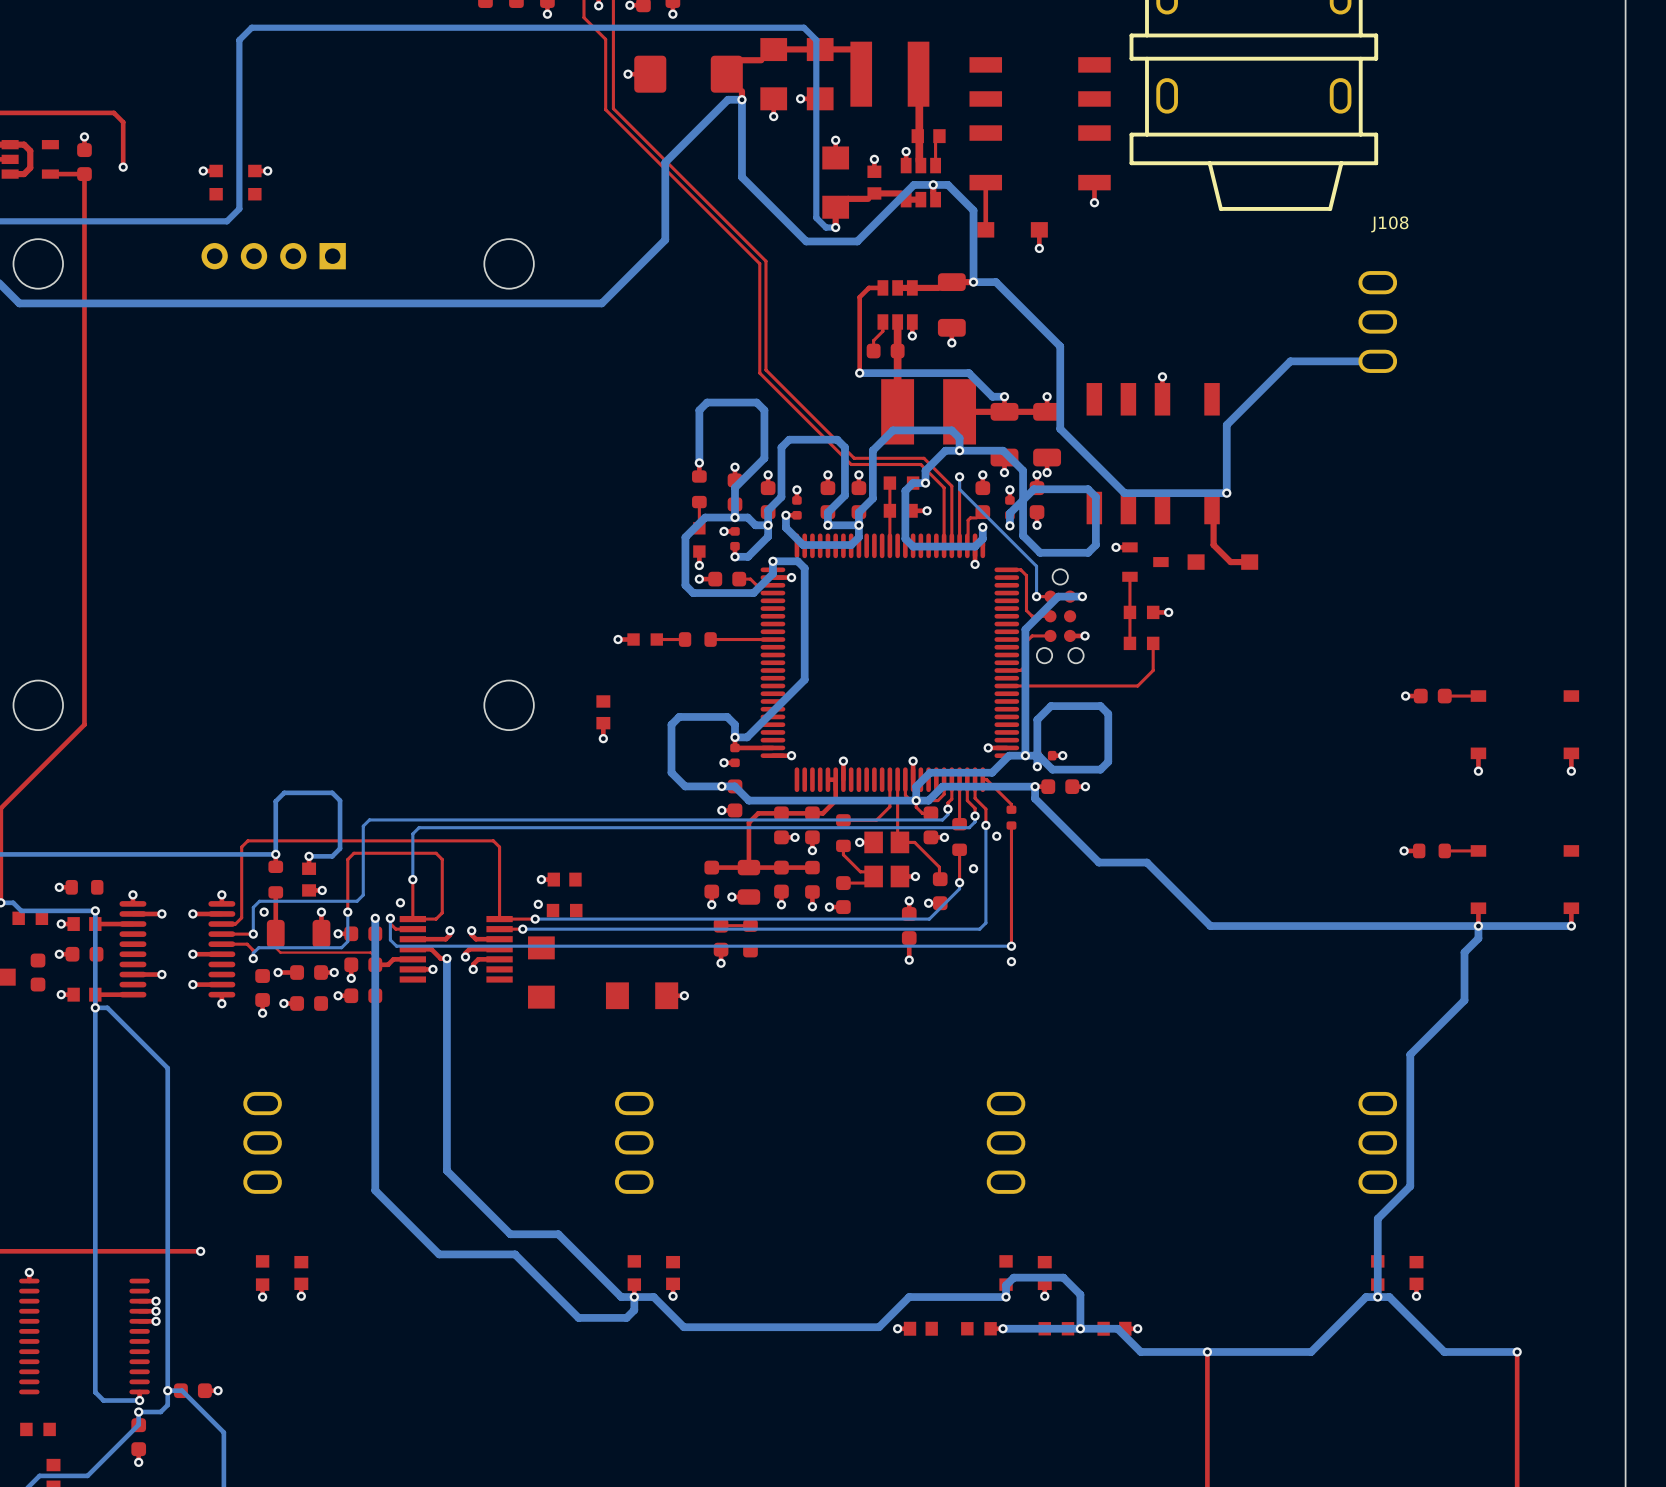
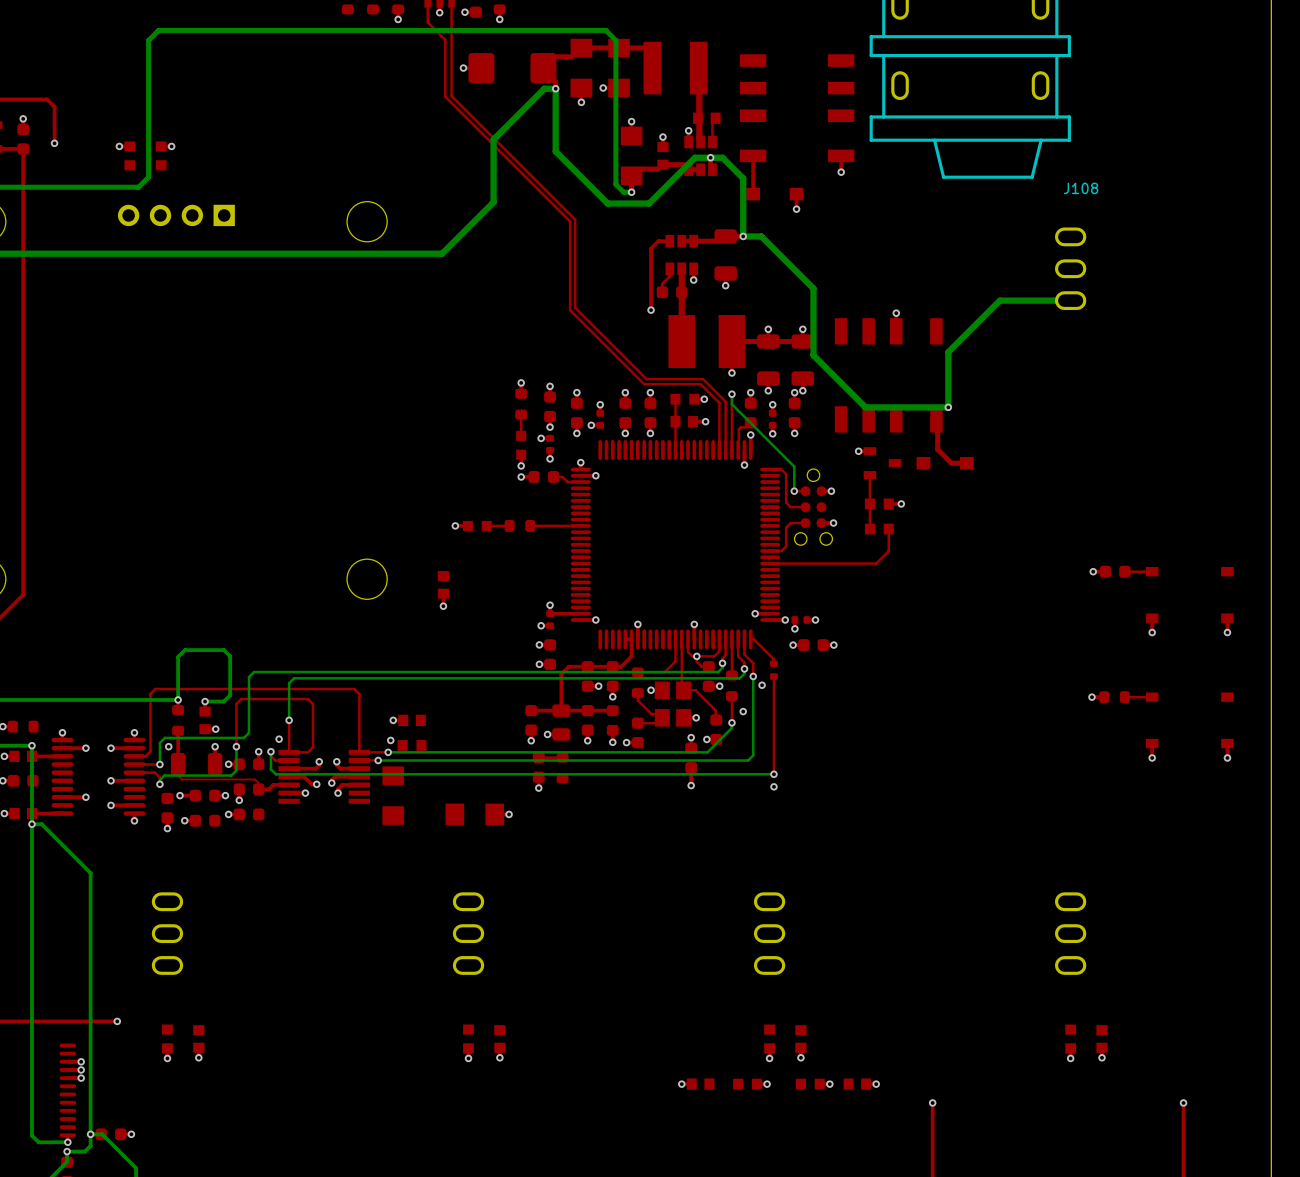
bottom track: (859, 373) (968, 373) (992, 396) (1004, 396) -> none
bottom track: (959, 450) (959, 438) (951, 430) (892, 430) (872, 450) (872, 498) (858, 512) (858, 537) (851, 545) (803, 545) (785, 527) (785, 515) -> none
bottom track: (699, 462) (699, 410) (707, 402) (756, 402) (764, 410) (764, 458) (735, 487) (735, 517) -> none
bottom track: (768, 525) (755, 525) (747, 517) (705, 517) (685, 537) (685, 585) (693, 593) (753, 593) (772, 573) (772, 561) (797, 561) (804, 568) (804, 679) (747, 737) (735, 737) (735, 724) (727, 716) (679, 716) (671, 724) (671, 772) (685, 786) (734, 786) (748, 800) (928, 800) (942, 786) (1035, 786) (1035, 798) (1098, 862) (1146, 862) (1210, 926) (1571, 926) -> none
bottom track: (858, 525) (827, 525) (827, 512) (844, 495) (844, 447) (837, 439) (789, 439) (781, 447) (781, 497) (768, 510) (768, 536) (748, 556) (735, 556) -> none
bottom track: (1009, 525) (1009, 513) (1033, 489) (1088, 489) (1095, 497) (1095, 545) (1088, 552) (1040, 552) (1023, 535) (1023, 470) (1003, 450) (945, 450) (925, 470) (925, 483) (913, 483) (905, 490) (905, 538) (913, 546) (975, 546) (982, 538) (982, 527) -> none
bottom track: (1082, 596) (1058, 596) (1025, 629) (1025, 755) -> none
bottom track: (1037, 766) (1037, 719) (1050, 706) (1100, 706) (1108, 713) (1108, 761) (1100, 769) (1052, 769) (1038, 755) (1009, 755) (992, 772) (930, 772) (916, 786) (916, 800) -> none
bottom track: (375, 918) (375, 1190) (439, 1254) (515, 1254) (578, 1317) (626, 1317) (634, 1310) (634, 1297) -> none
bottom track: (1478, 926) (1478, 938) (1464, 952) (1464, 1000) (1410, 1054) (1410, 1186) (1377, 1218) (1377, 1297) -> none
bottom track: (446, 958) (446, 1170) (510, 1234) (558, 1234) (621, 1297) (653, 1297) (683, 1327) (879, 1327) (909, 1297) (1006, 1297) (1006, 1285) (1013, 1277) (1063, 1277) (1080, 1294) (1080, 1328) -> none
bottom track: (1002, 1328) (1117, 1328) (1140, 1351) (1311, 1351) (1366, 1297) (1389, 1297) (1444, 1351) (1517, 1351) -> none

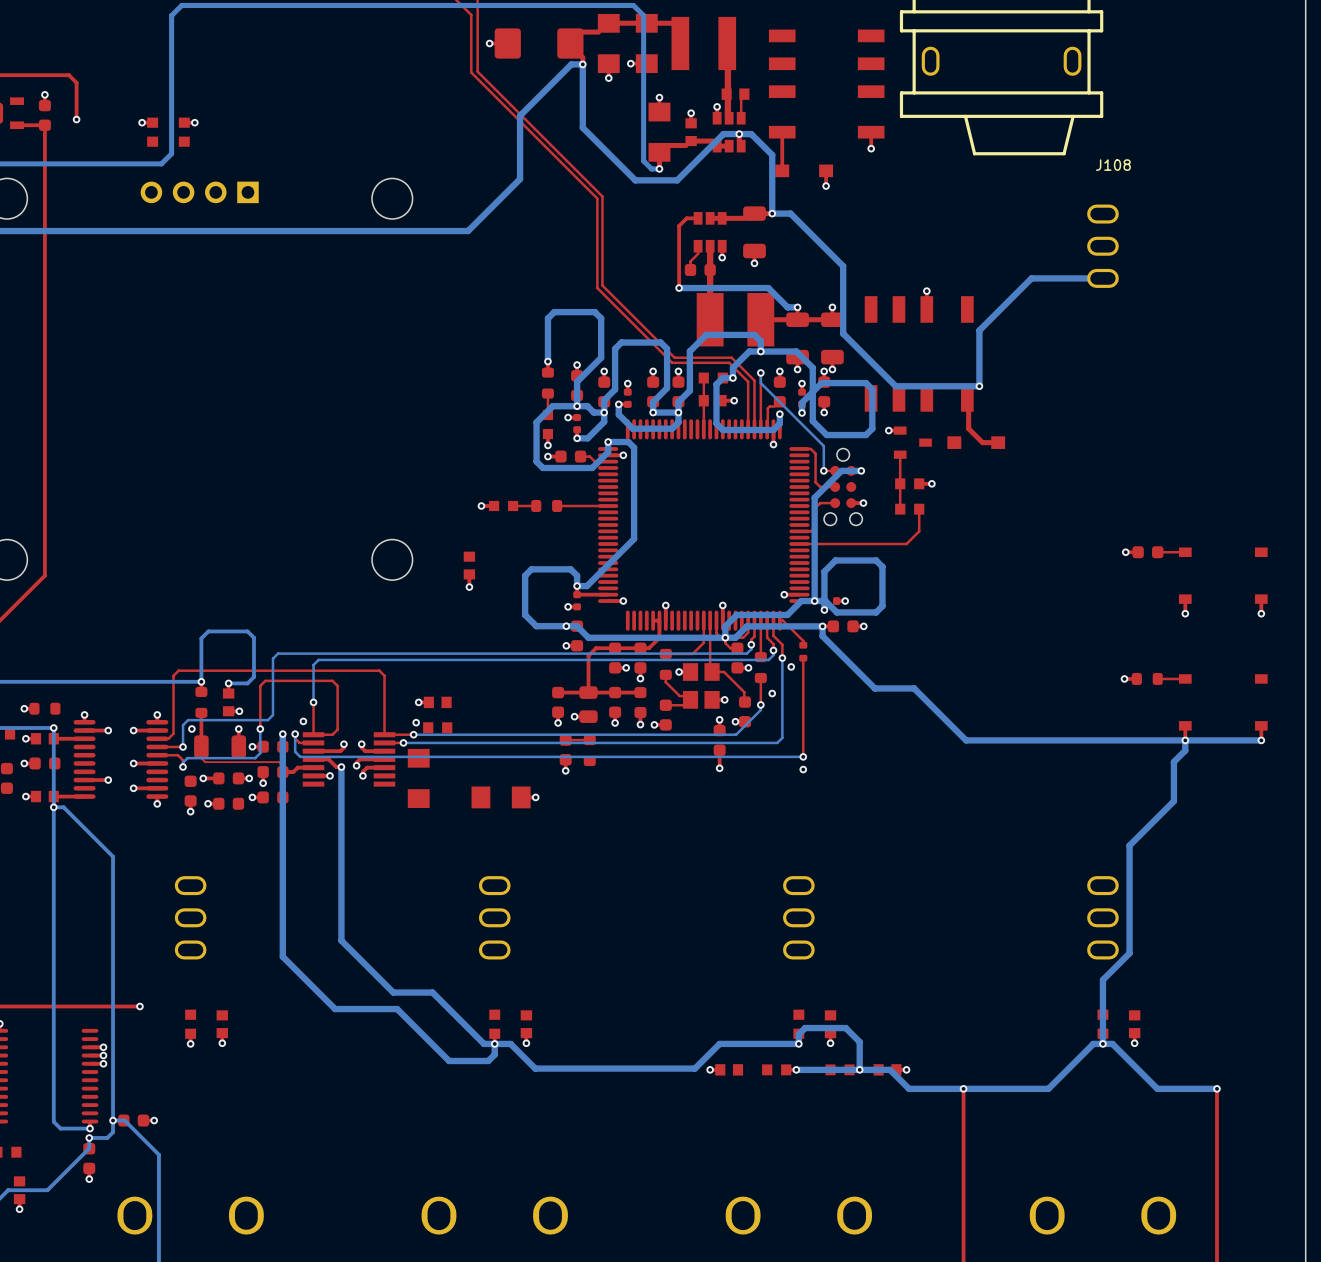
bottom track: none -> (679, 288) (768, 288) (787, 307) (797, 307)
bottom track: none -> (760, 351) (760, 341) (754, 334) (706, 334) (689, 351) (689, 390) (678, 402) (678, 422) (672, 428) (632, 428) (618, 414) (618, 404)
bottom track: none -> (547, 361) (547, 318) (554, 312) (594, 312) (601, 318) (601, 357) (577, 381) (577, 406)
bottom track: none -> (604, 412) (593, 412) (587, 406) (552, 406) (536, 422) (536, 461) (542, 467) (592, 467) (608, 452) (608, 442) (628, 442) (634, 447) (634, 538) (586, 586) (577, 586) (577, 575) (570, 569) (531, 569) (525, 575) (525, 614) (536, 626) (576, 626) (588, 637) (735, 637) (746, 626) (822, 626) (822, 636) (874, 688) (914, 688) (966, 740) (1261, 740)
bottom track: none -> (678, 412) (653, 412) (653, 402) (667, 388) (667, 348) (660, 342) (621, 342) (615, 348) (615, 389) (604, 400) (604, 421) (587, 438) (577, 438)
bottom track: none -> (802, 412) (802, 402) (821, 383) (866, 383) (872, 389) (872, 428) (866, 435) (826, 435) (812, 421) (812, 367) (796, 351) (749, 351) (732, 367) (732, 378) (722, 378) (716, 384) (716, 423) (722, 429) (773, 429) (779, 423) (779, 414)
bottom track: none -> (861, 470) (841, 470) (814, 497) (814, 601)
bottom track: none -> (824, 610) (824, 571) (835, 560) (876, 560) (882, 566) (882, 606) (876, 612) (836, 612) (825, 601) (801, 601) (787, 614) (736, 614) (725, 626) (725, 637)
bottom track: none -> (282, 734) (282, 956) (335, 1009) (397, 1009) (449, 1060) (488, 1060) (494, 1054) (494, 1043)
bottom track: none -> (1185, 740) (1185, 750) (1173, 761) (1173, 801) (1129, 845) (1129, 953) (1102, 979) (1102, 1043)
bottom track: none -> (341, 767) (341, 940) (393, 992) (432, 992) (484, 1043) (510, 1043) (535, 1068) (694, 1068) (719, 1043) (798, 1043) (798, 1034) (805, 1028) (845, 1028) (859, 1042) (859, 1069)
bottom track: none -> (796, 1069) (890, 1069) (909, 1088) (1048, 1088) (1093, 1043) (1112, 1043) (1157, 1088) (1216, 1088)

